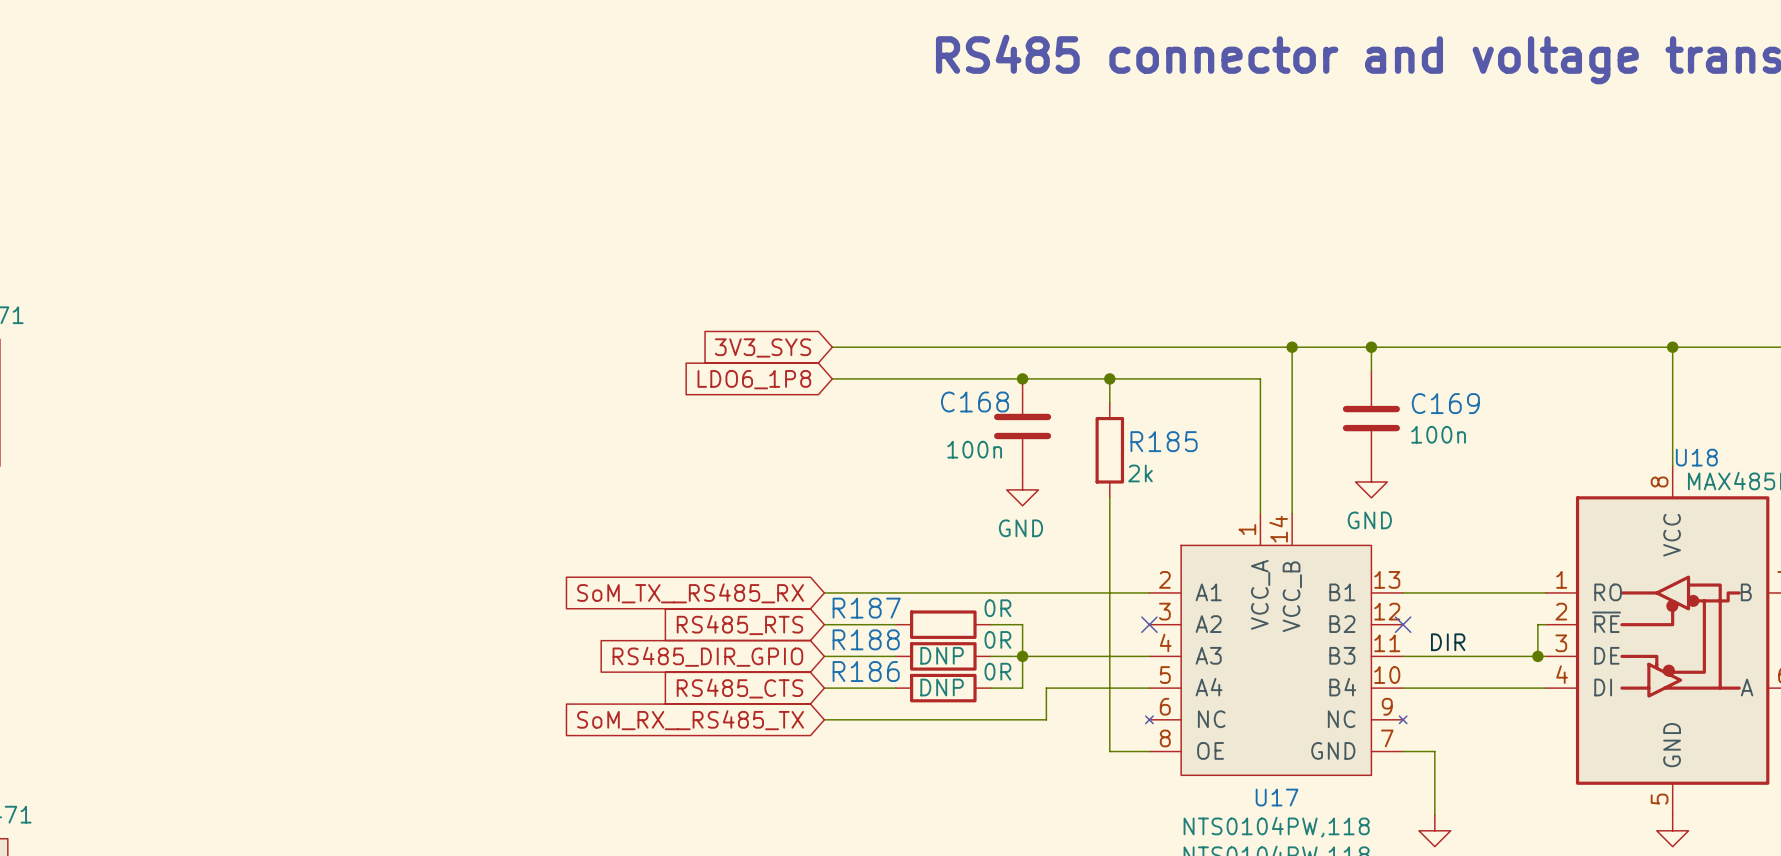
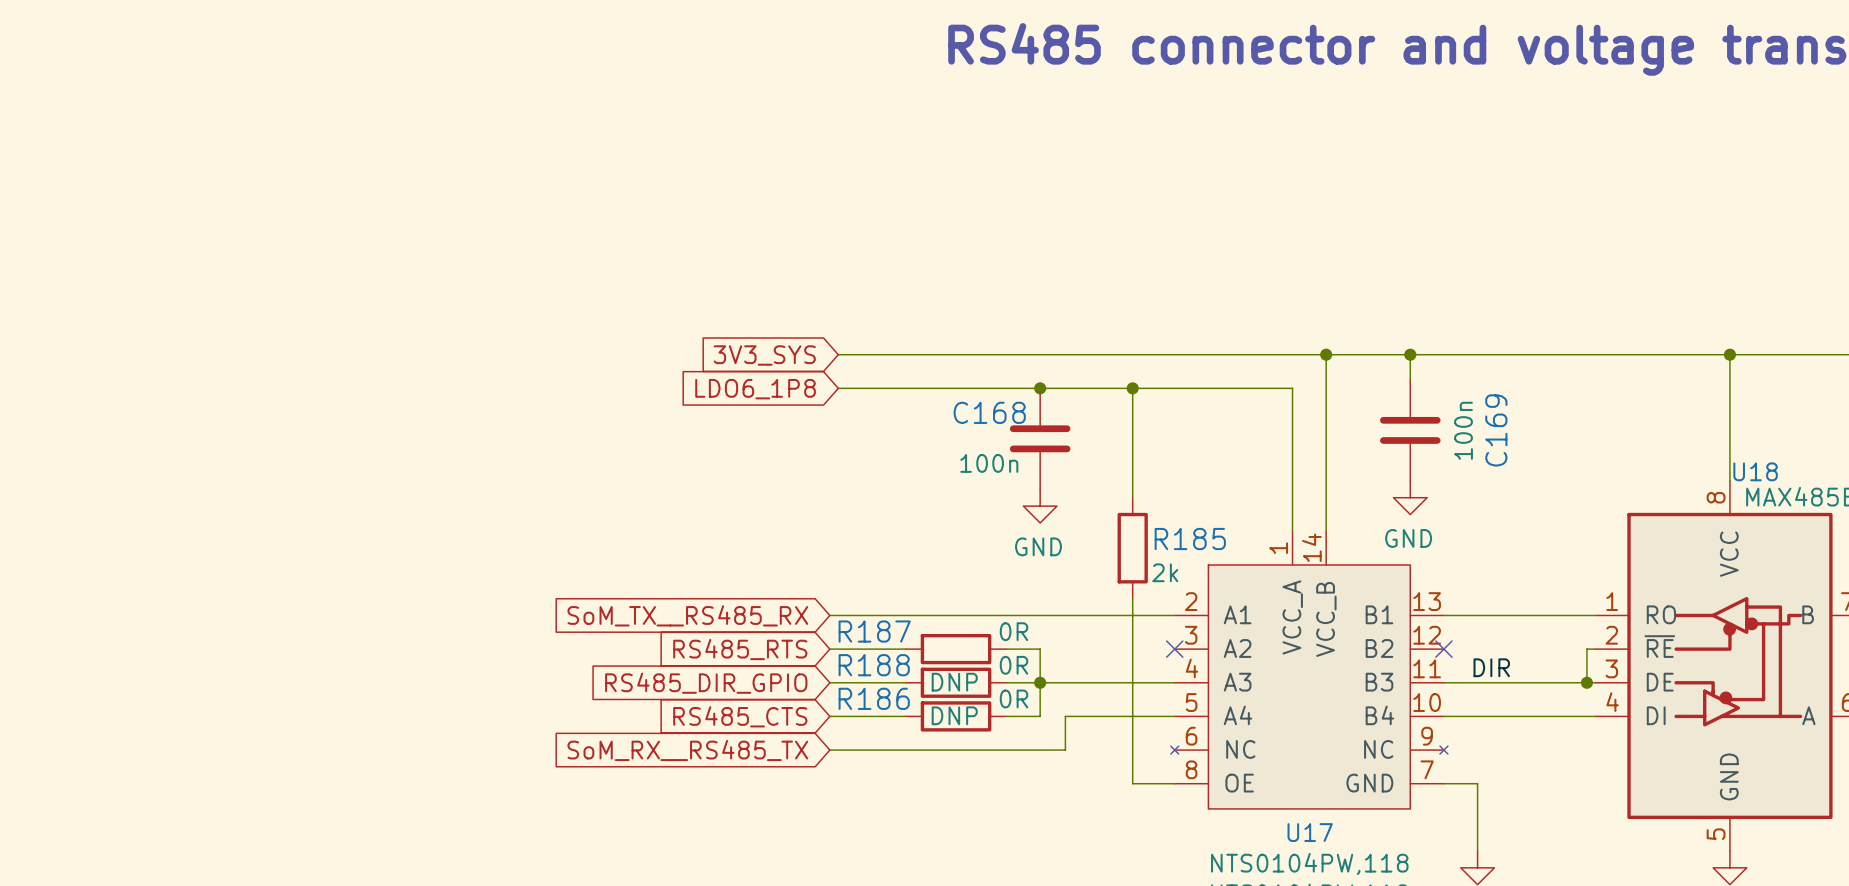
C169 name rotation: 0° (1445, 403) -> 90° counterclockwise (1496, 430)
C169 text rotation: 0° (1438, 434) -> 90° counterclockwise (1463, 430)
R185 position: (1109, 450) -> (1132, 548)
wire: (1109, 497) (1109, 577) -> (1132, 413) (1132, 497)

